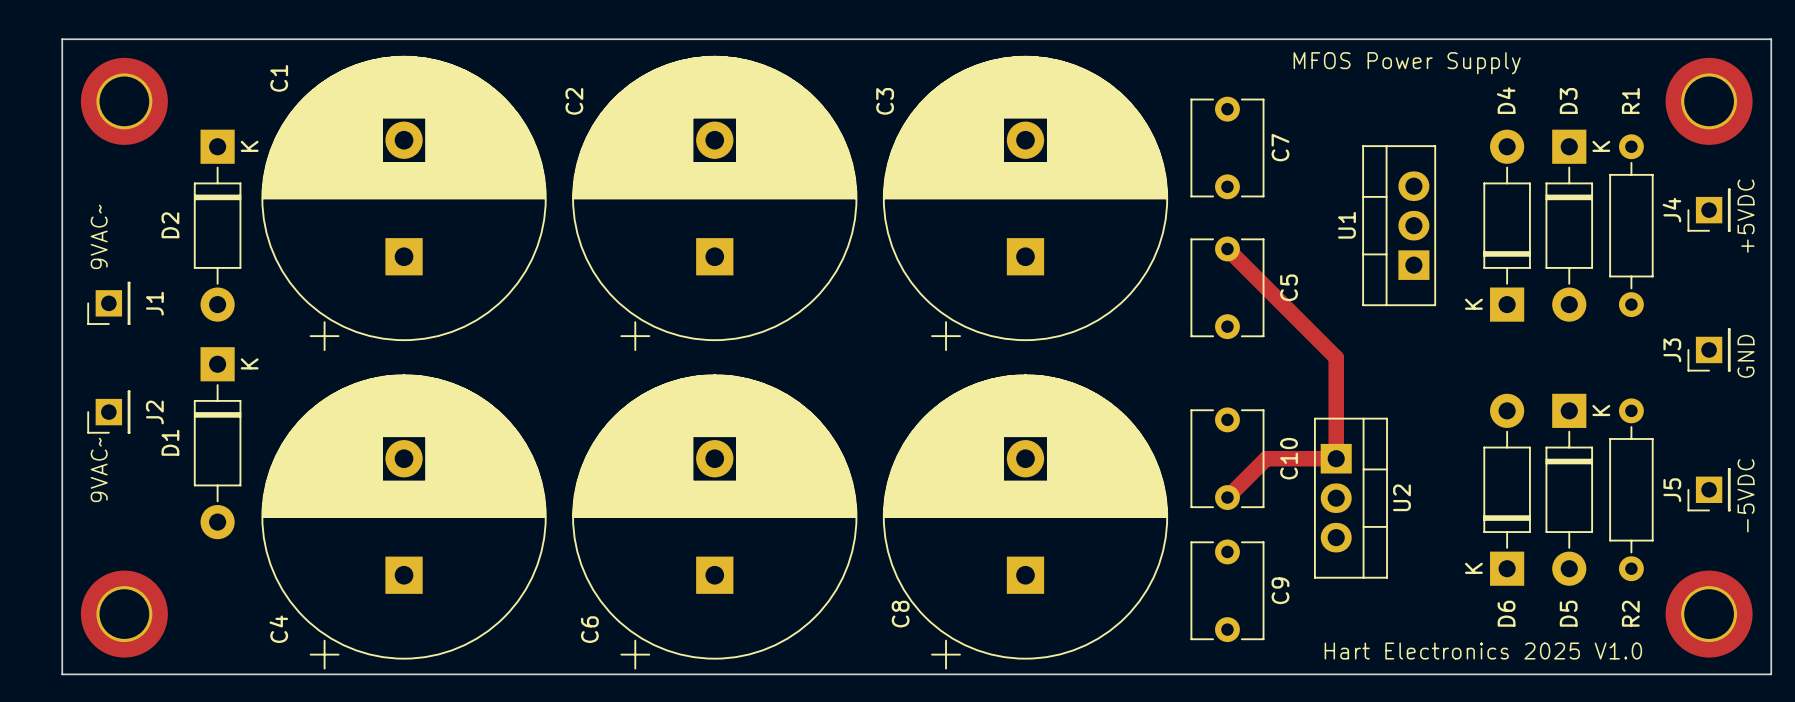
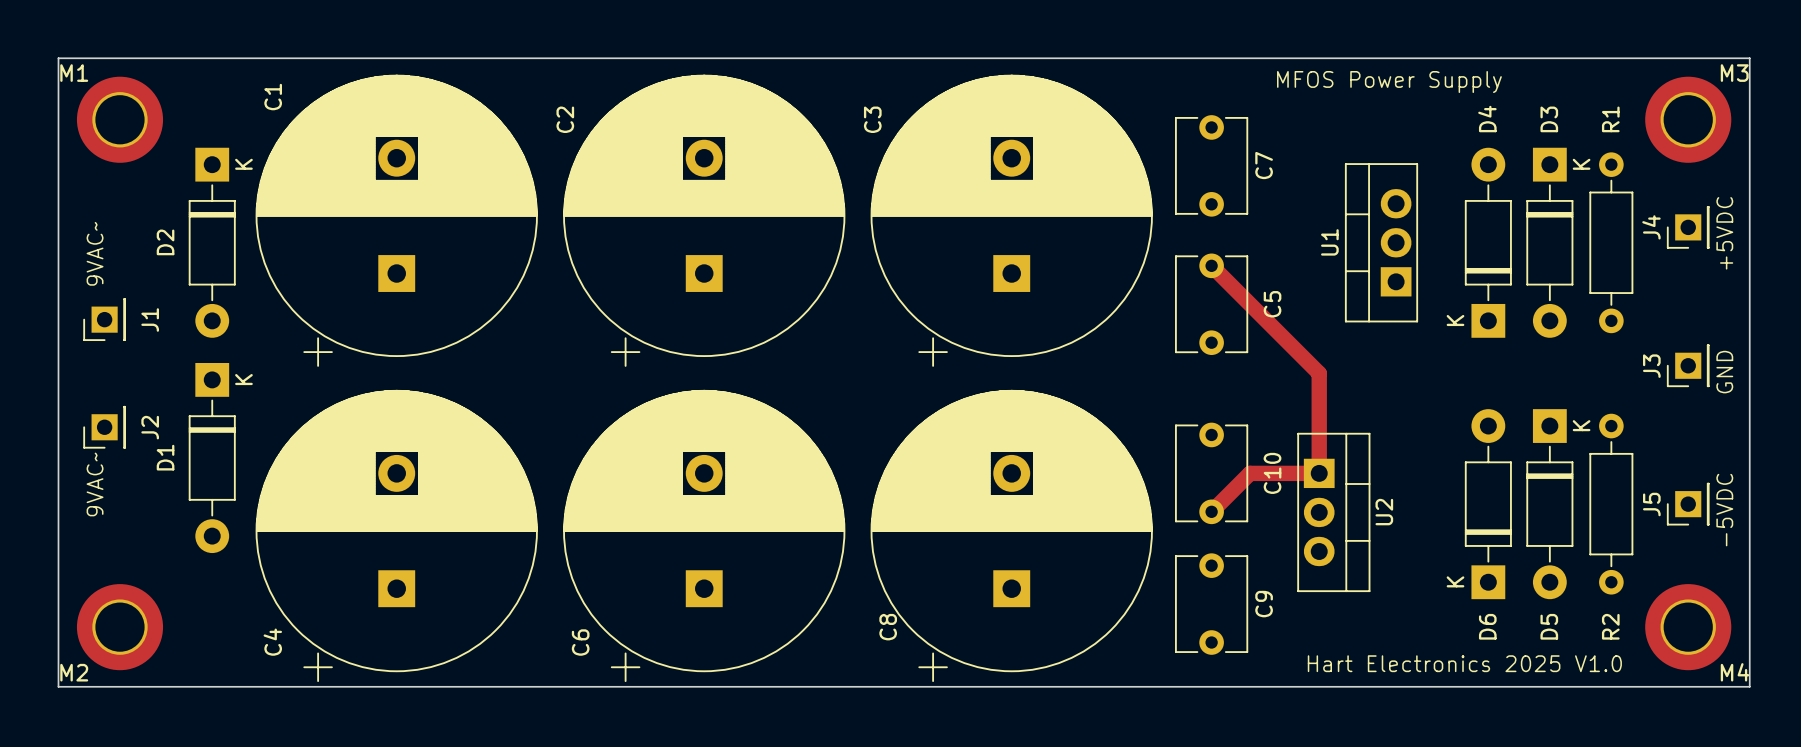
M1 name: none -> M1 (74, 73)
M3 name: none -> M3 (1734, 73)
M4 name: none -> M4 (1735, 672)
M2 name: none -> M2 (74, 672)

